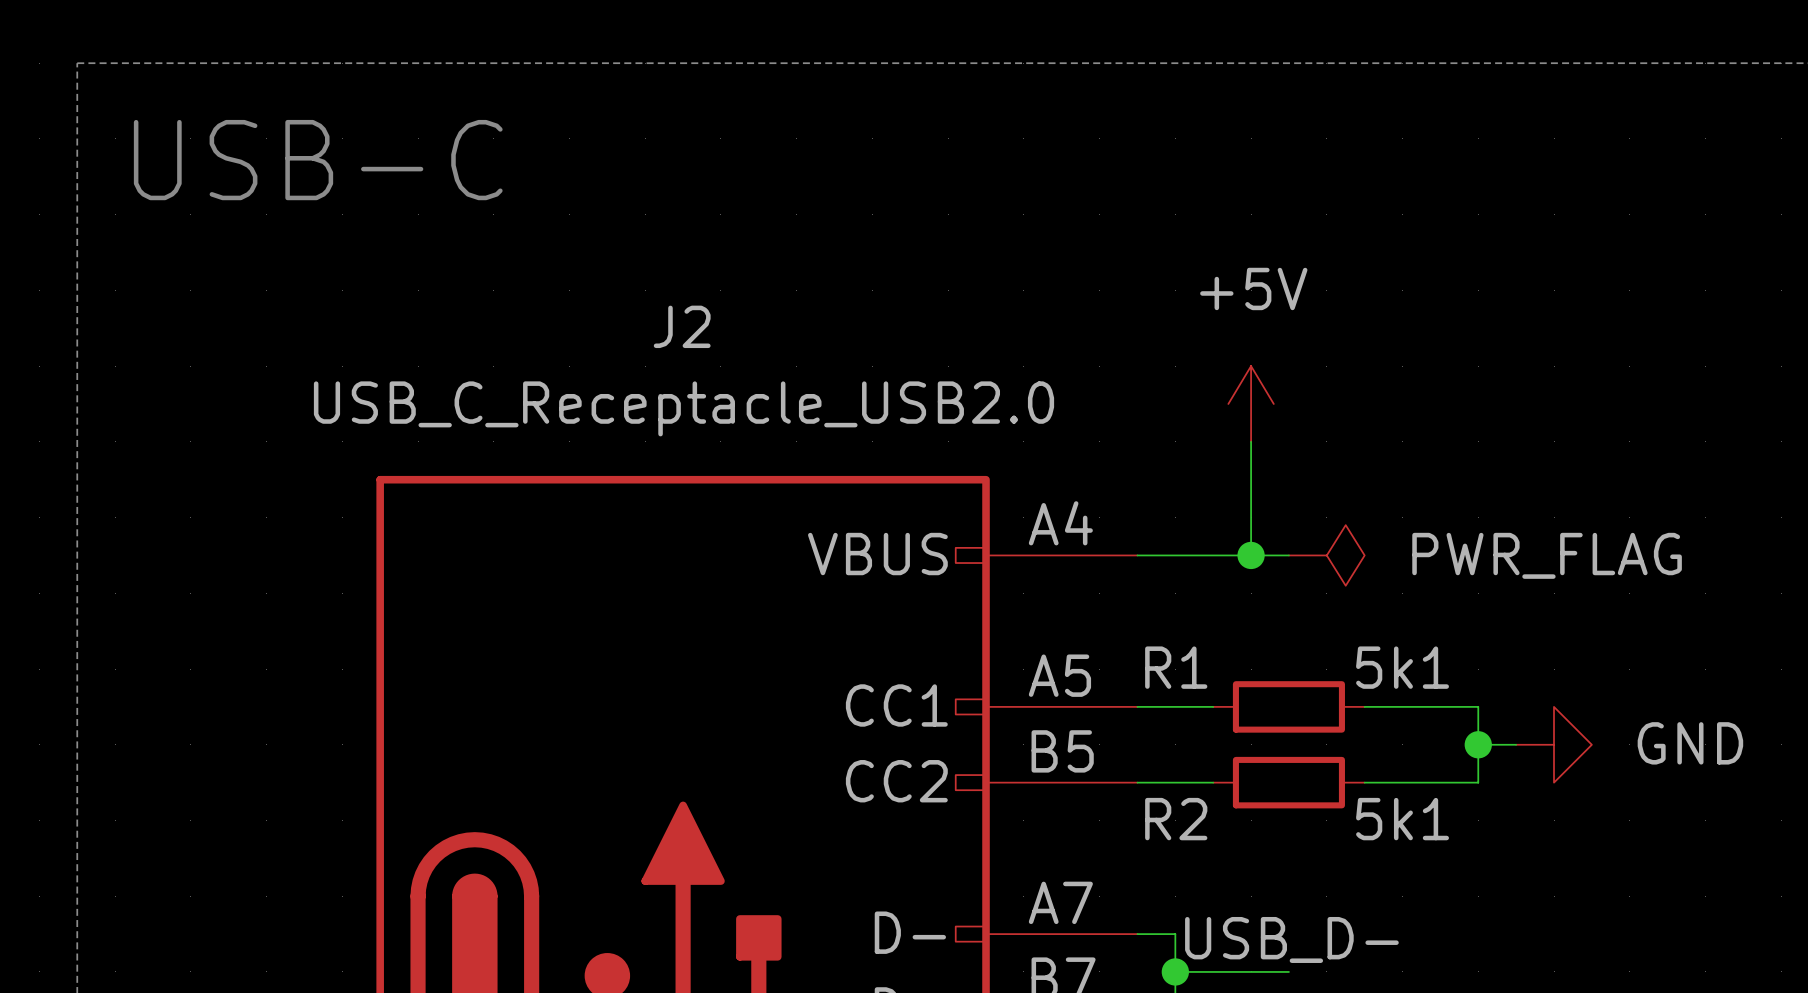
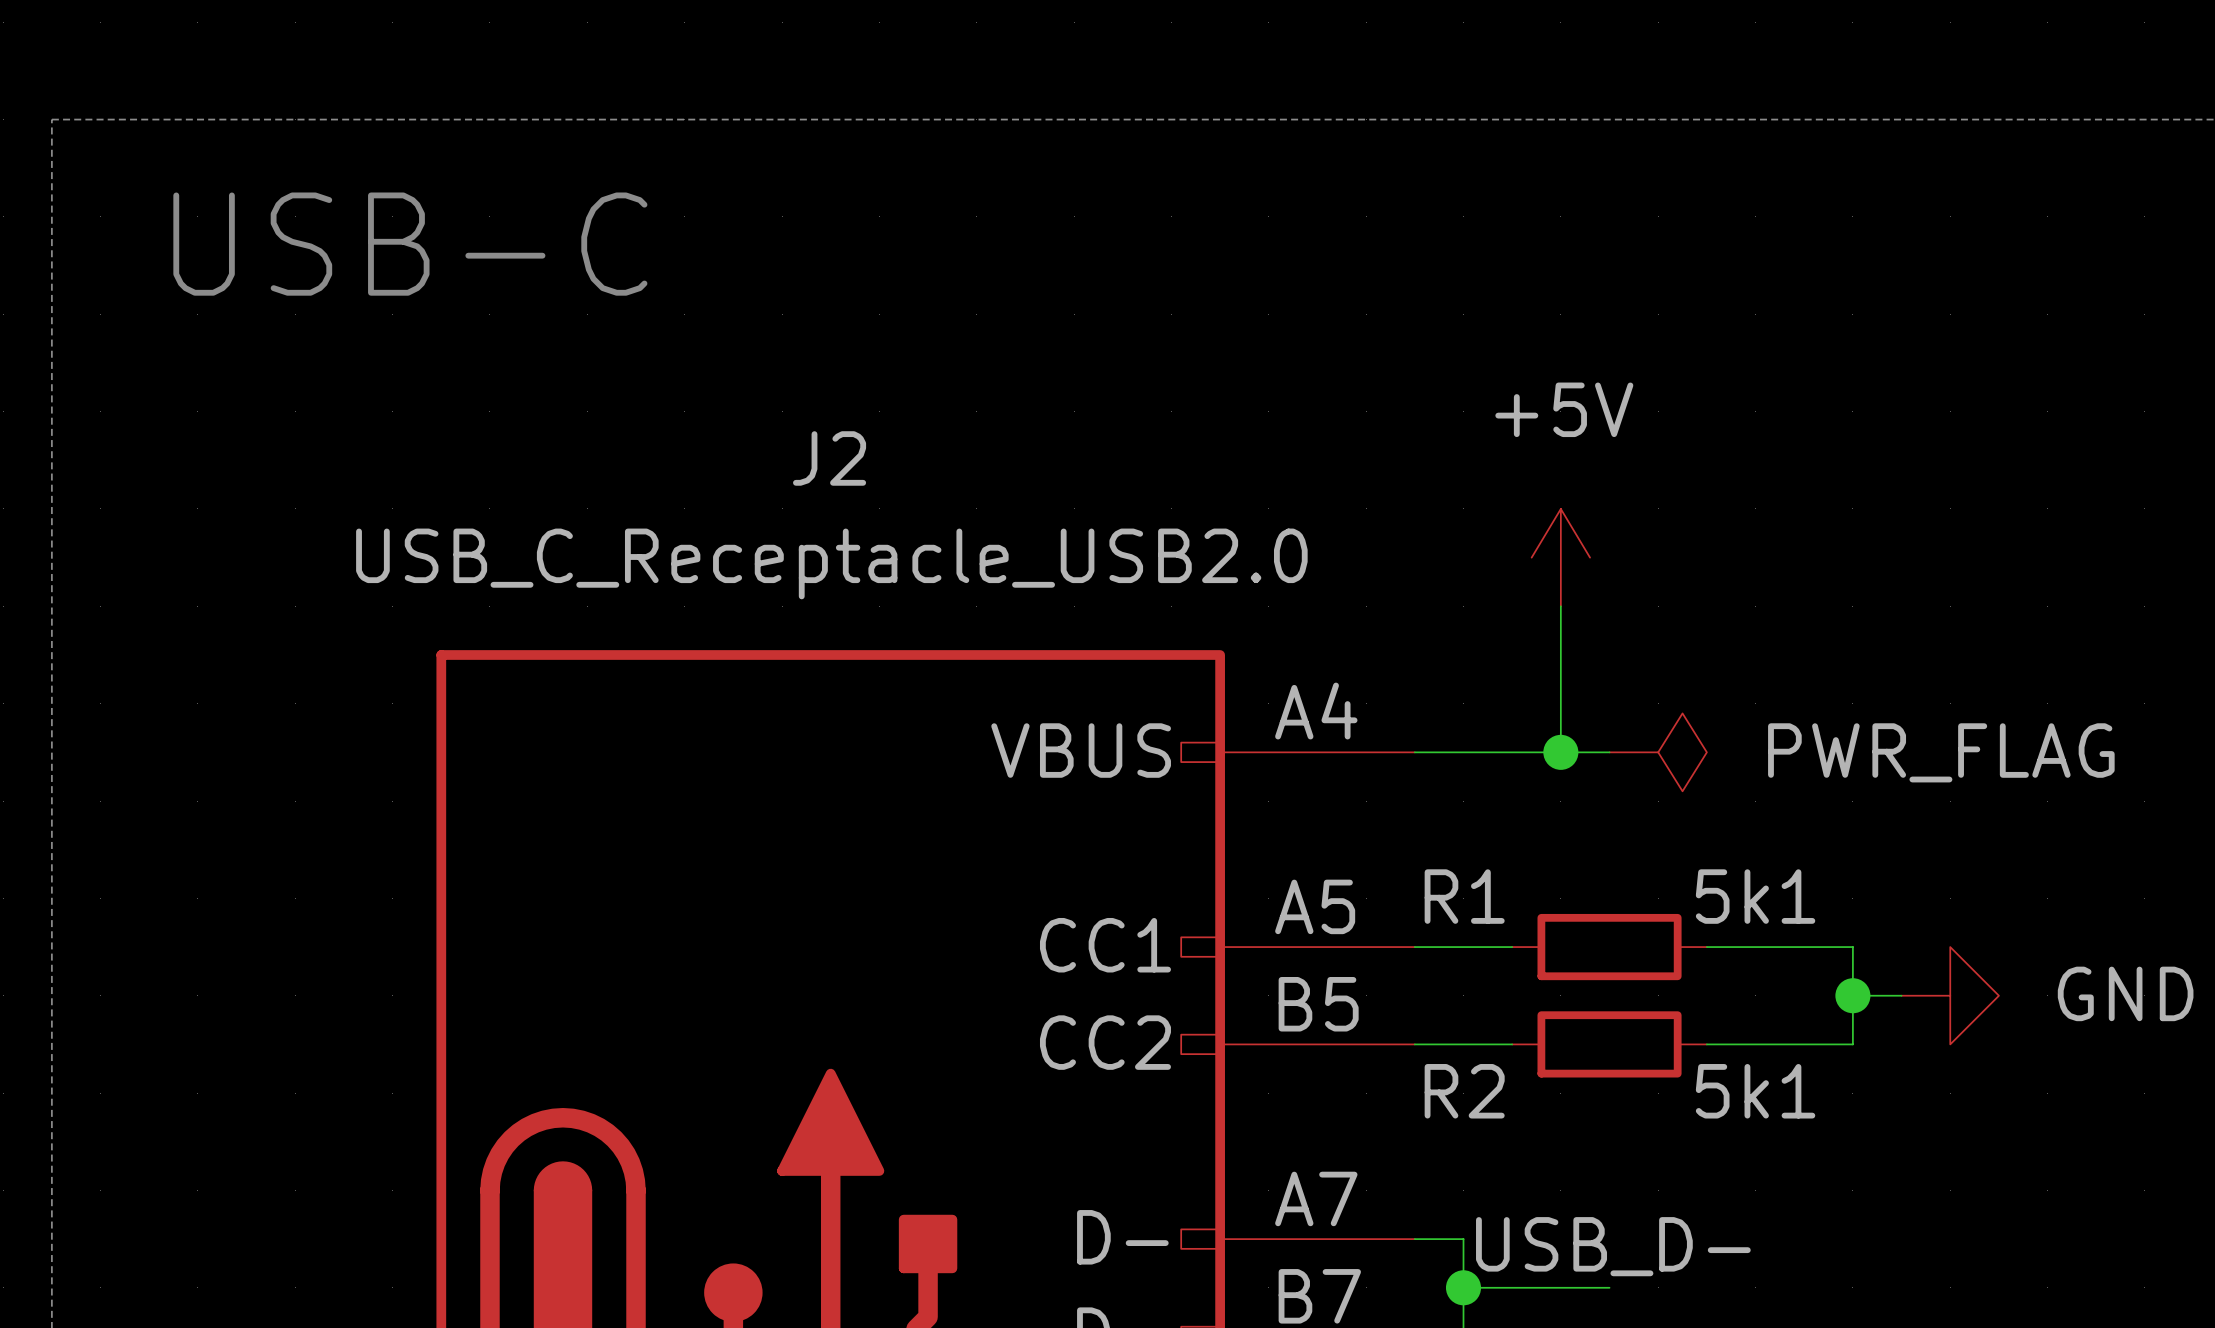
text position: USB-C (318, 160) -> USB-C (410, 244)

